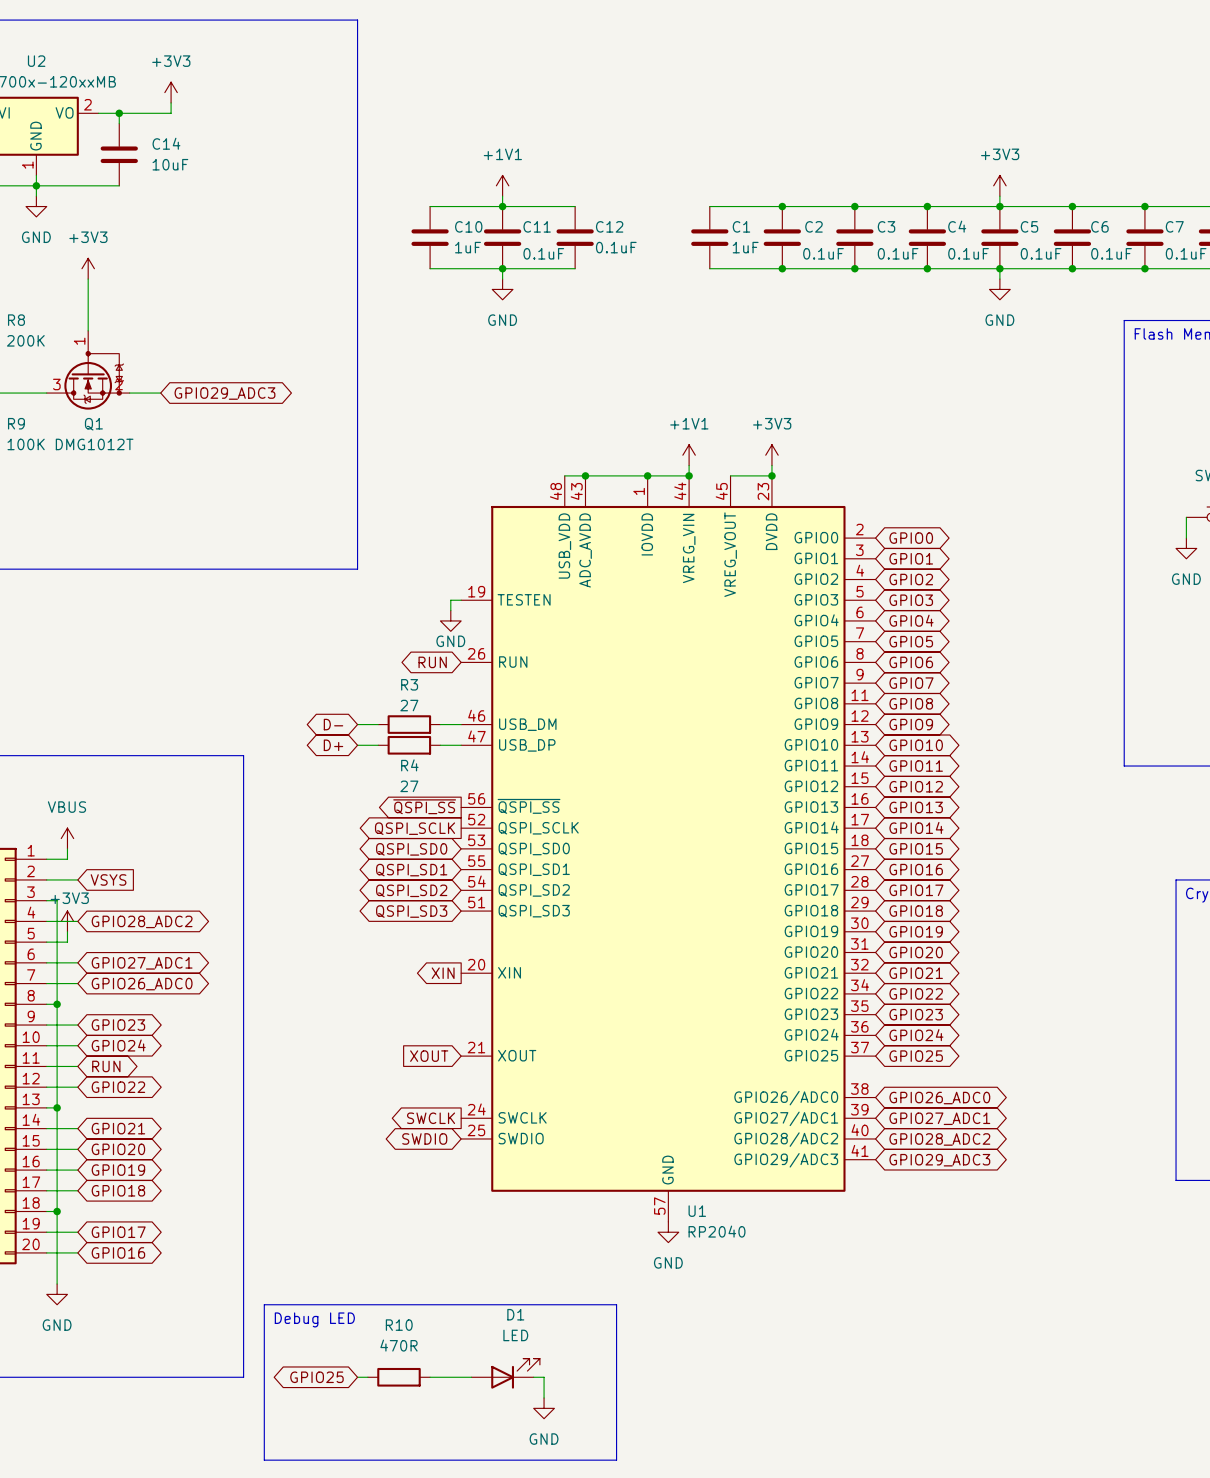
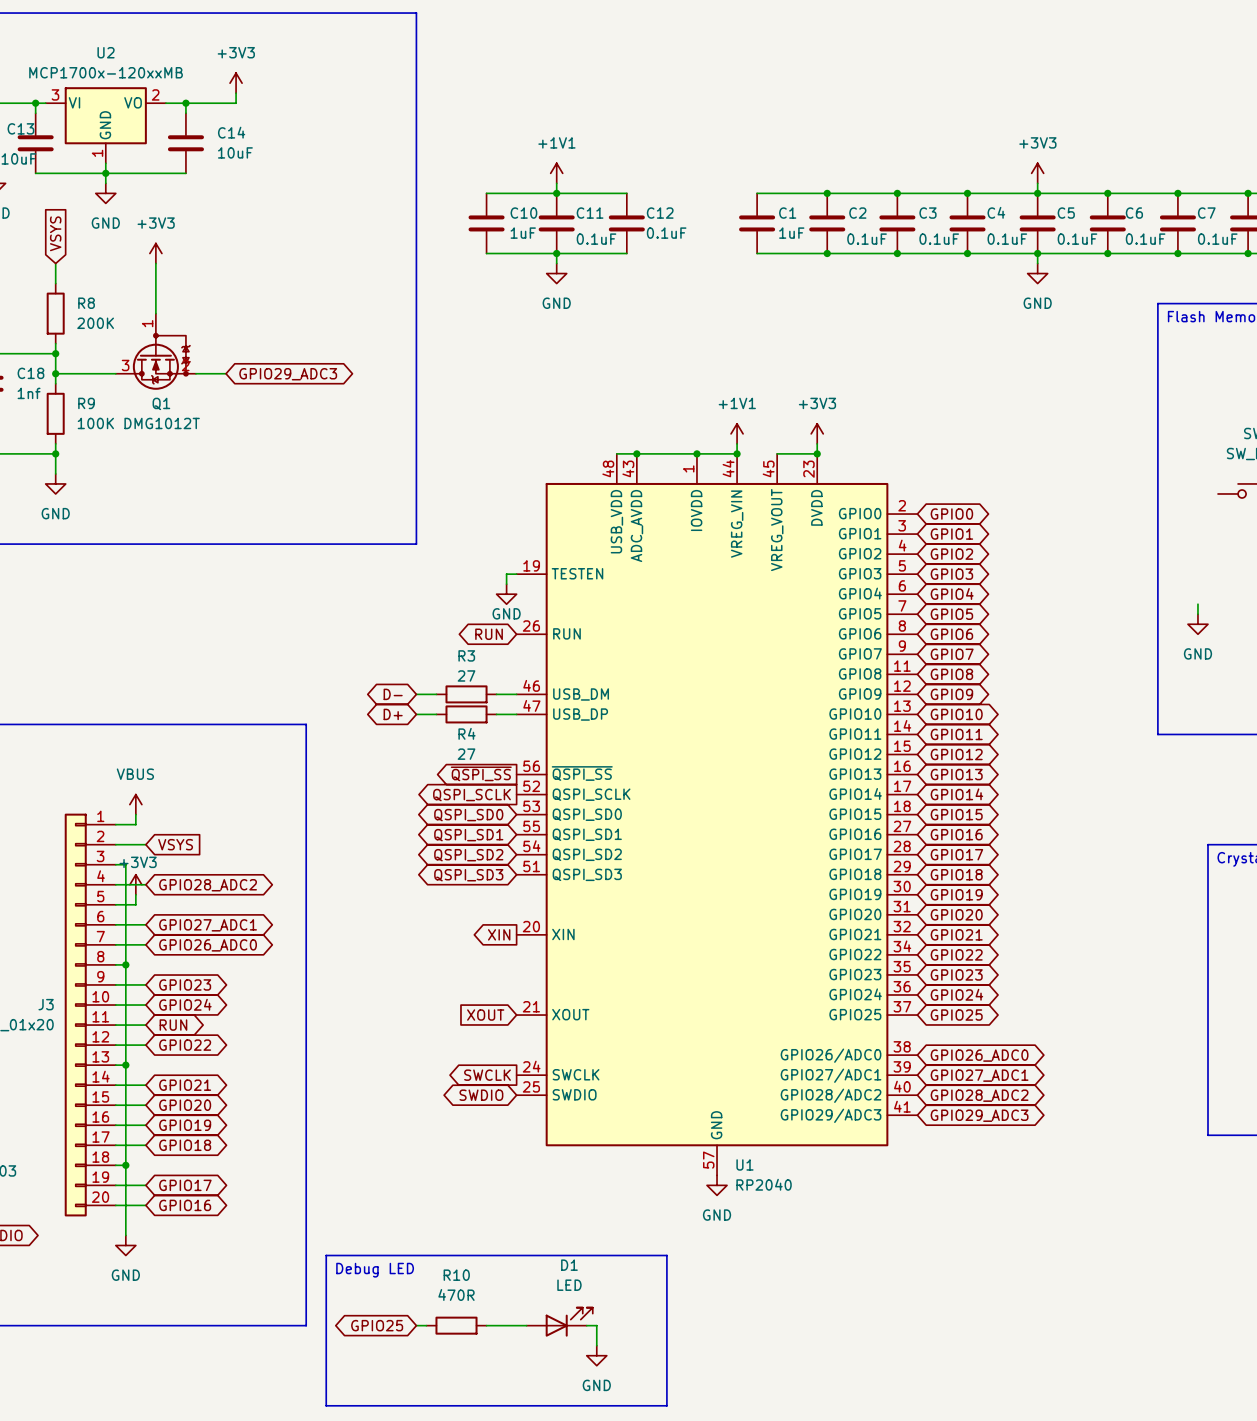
wire: (1186, 517) (1186, 538) -> none
power symbol: GND (1186, 548) -> none
wire: none -> (1197, 604) (1197, 614)
power symbol: none -> GND (1197, 624)

